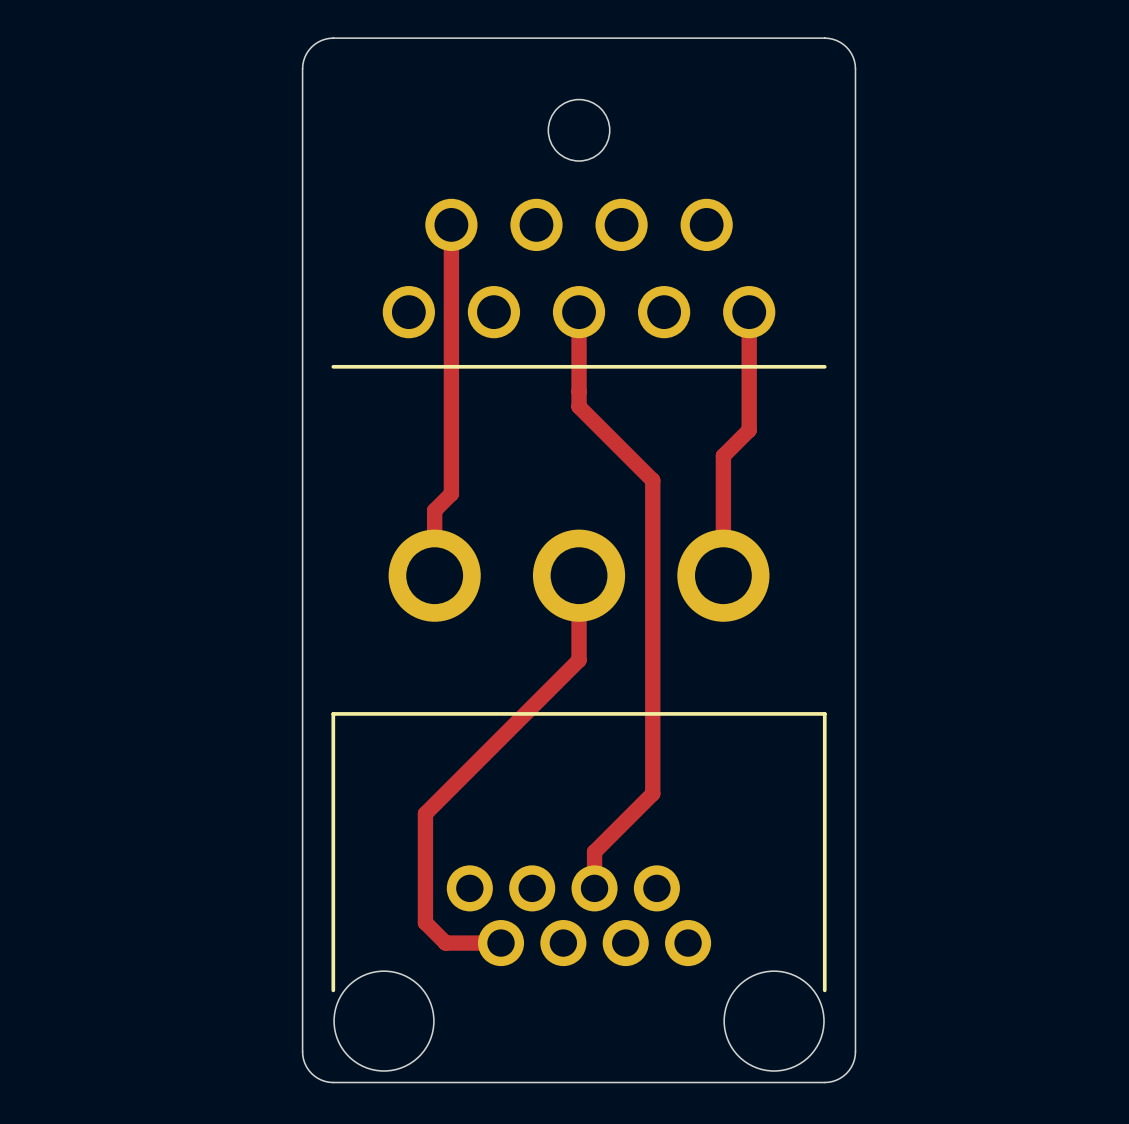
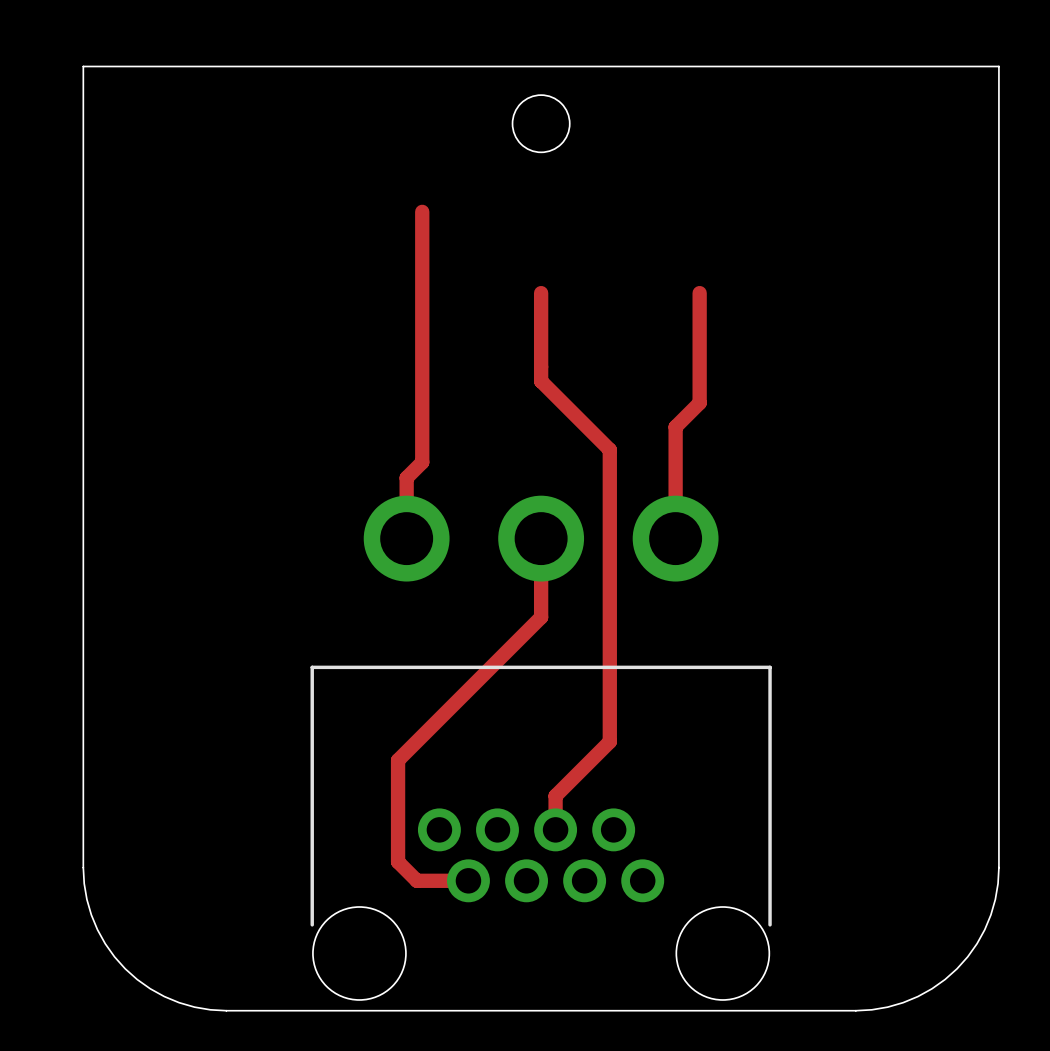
part: (579, 283) -> none
board edge: (333, 1082) (321, 1080) (311, 1073) (304, 1063) (302, 1051) (302, 68) (304, 57) (311, 47) (321, 40) (333, 38) (824, 38) (836, 40) (843, 44) (853, 57) (855, 68) (855, 1051) (853, 1063) (846, 1073) (836, 1080) (824, 1082) -> (312, 1010) (210, 1009) (179, 1002) (164, 996) (137, 979) (114, 956) (97, 929) (86, 899) (83, 867) (83, 66) (998, 66) (998, 867) (995, 899) (984, 929) (967, 956) (945, 979) (917, 996) (903, 1002) (871, 1009) (770, 1010)

